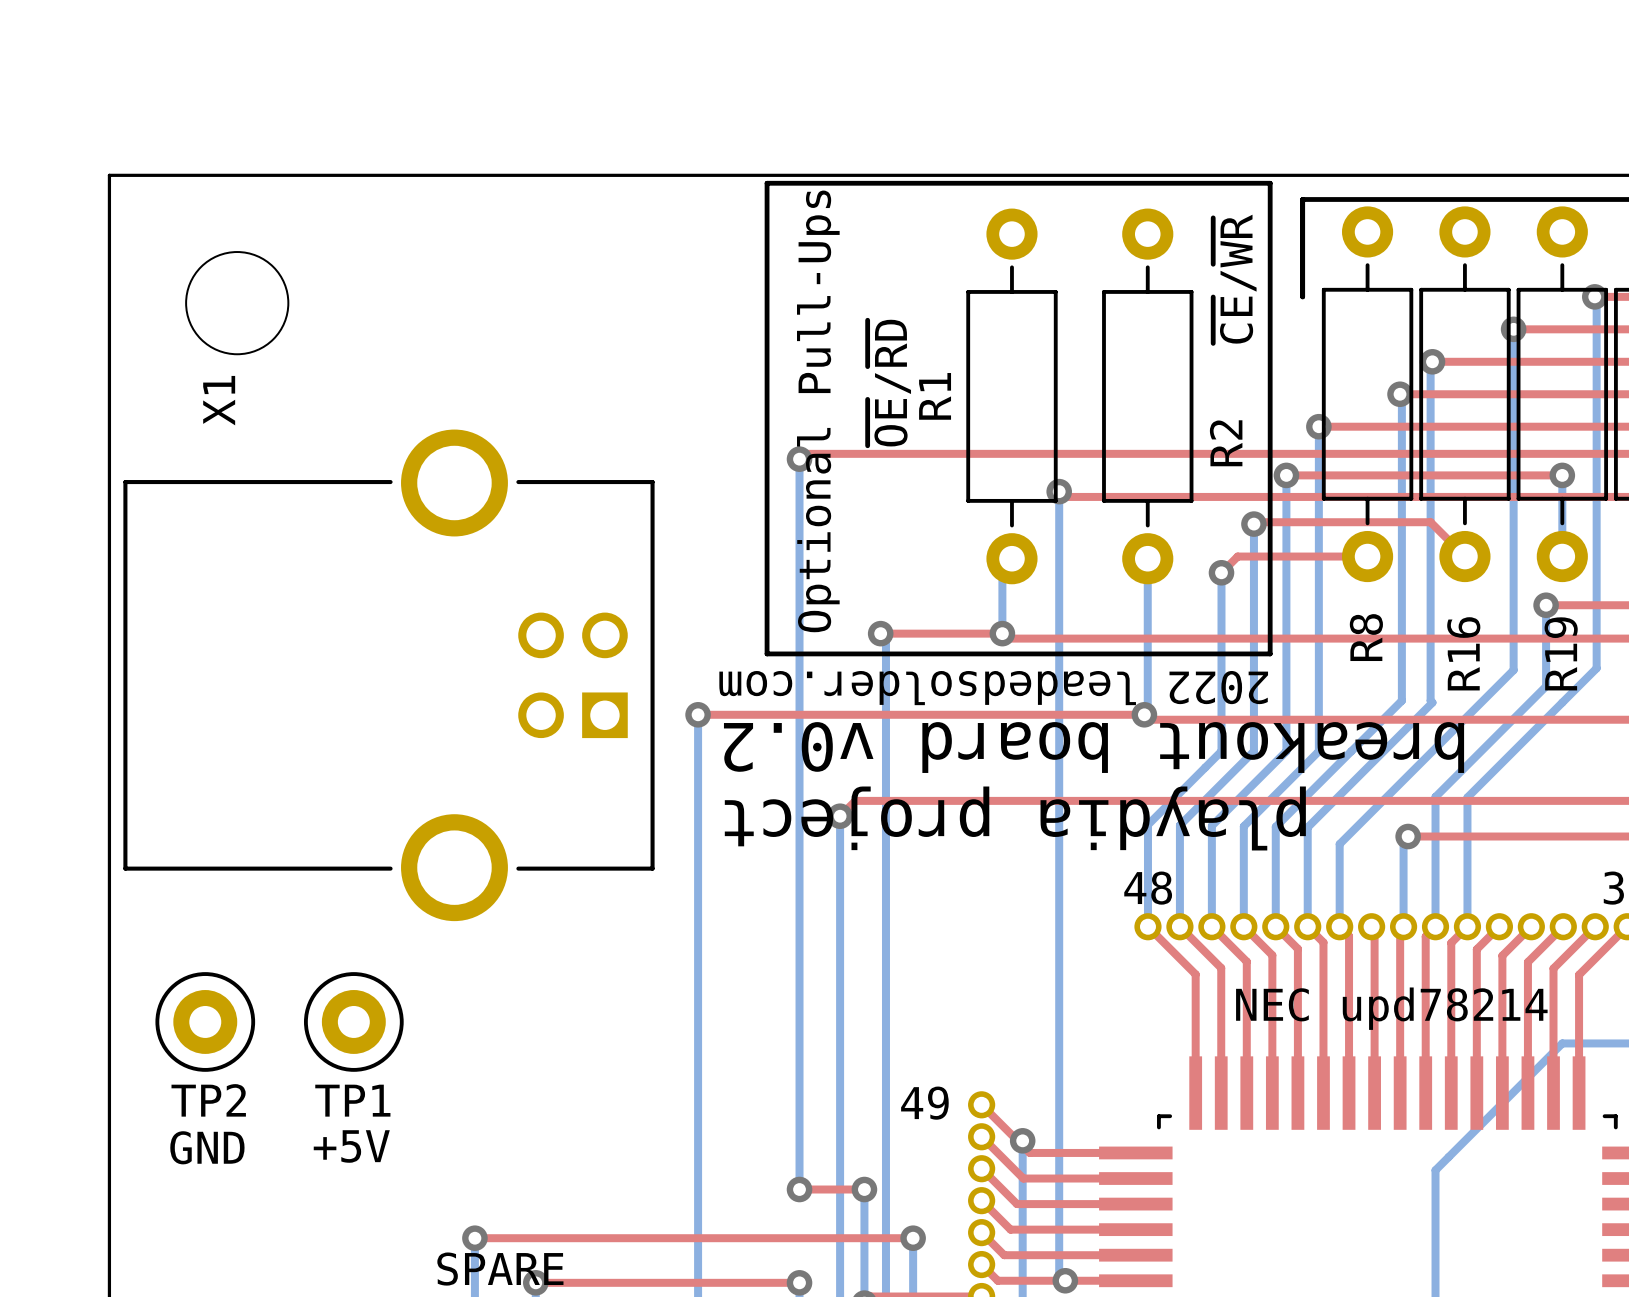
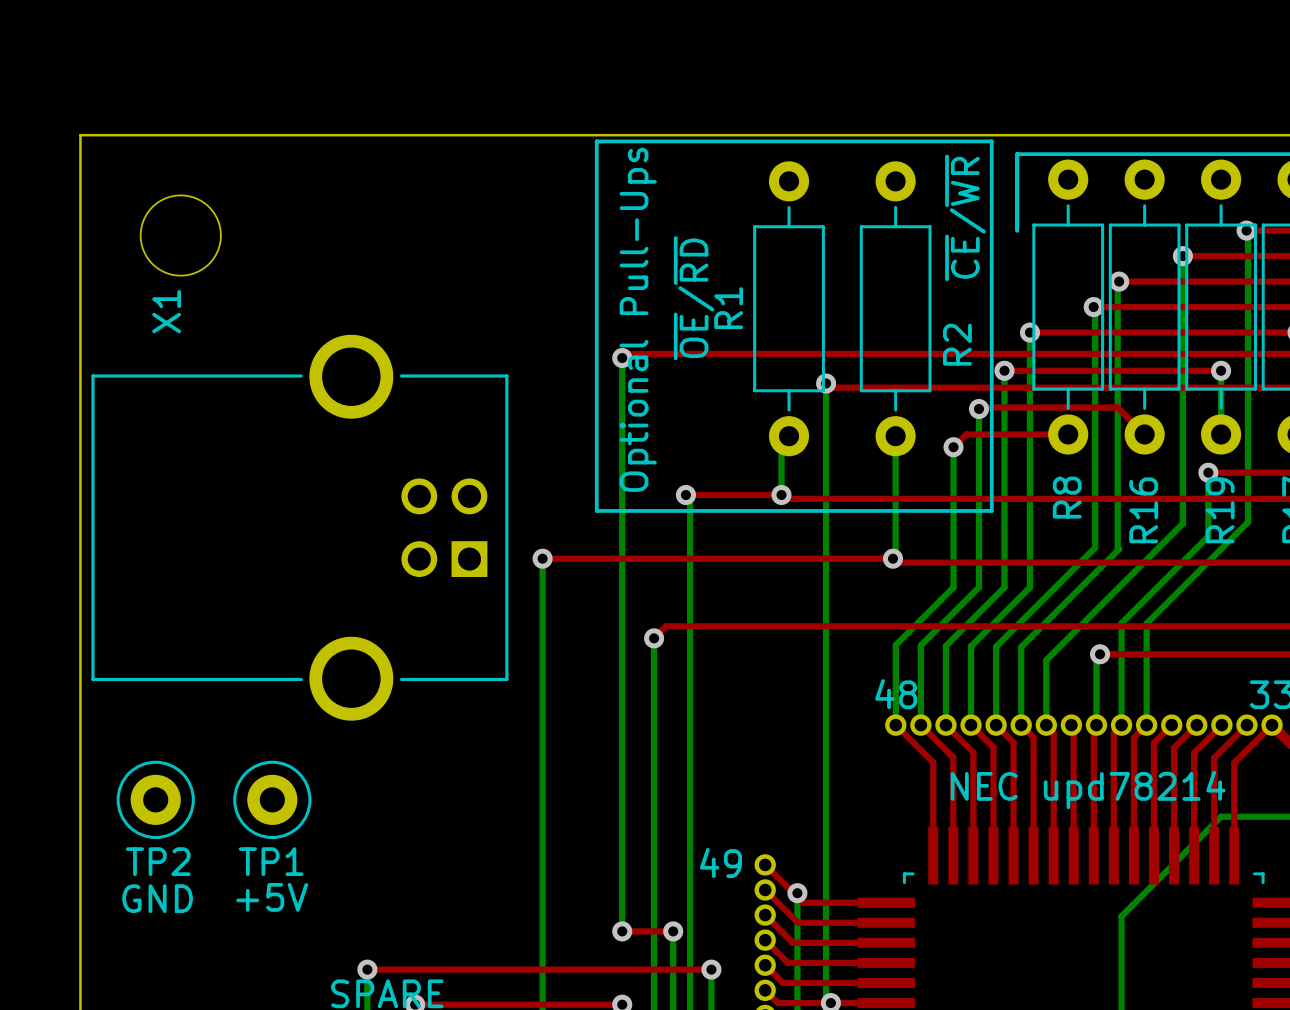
text: 2022 leadedsolder.com (993, 688) -> none
text: breakout board v0.2 (1094, 747) -> none
text: playdia project (1015, 818) -> none

